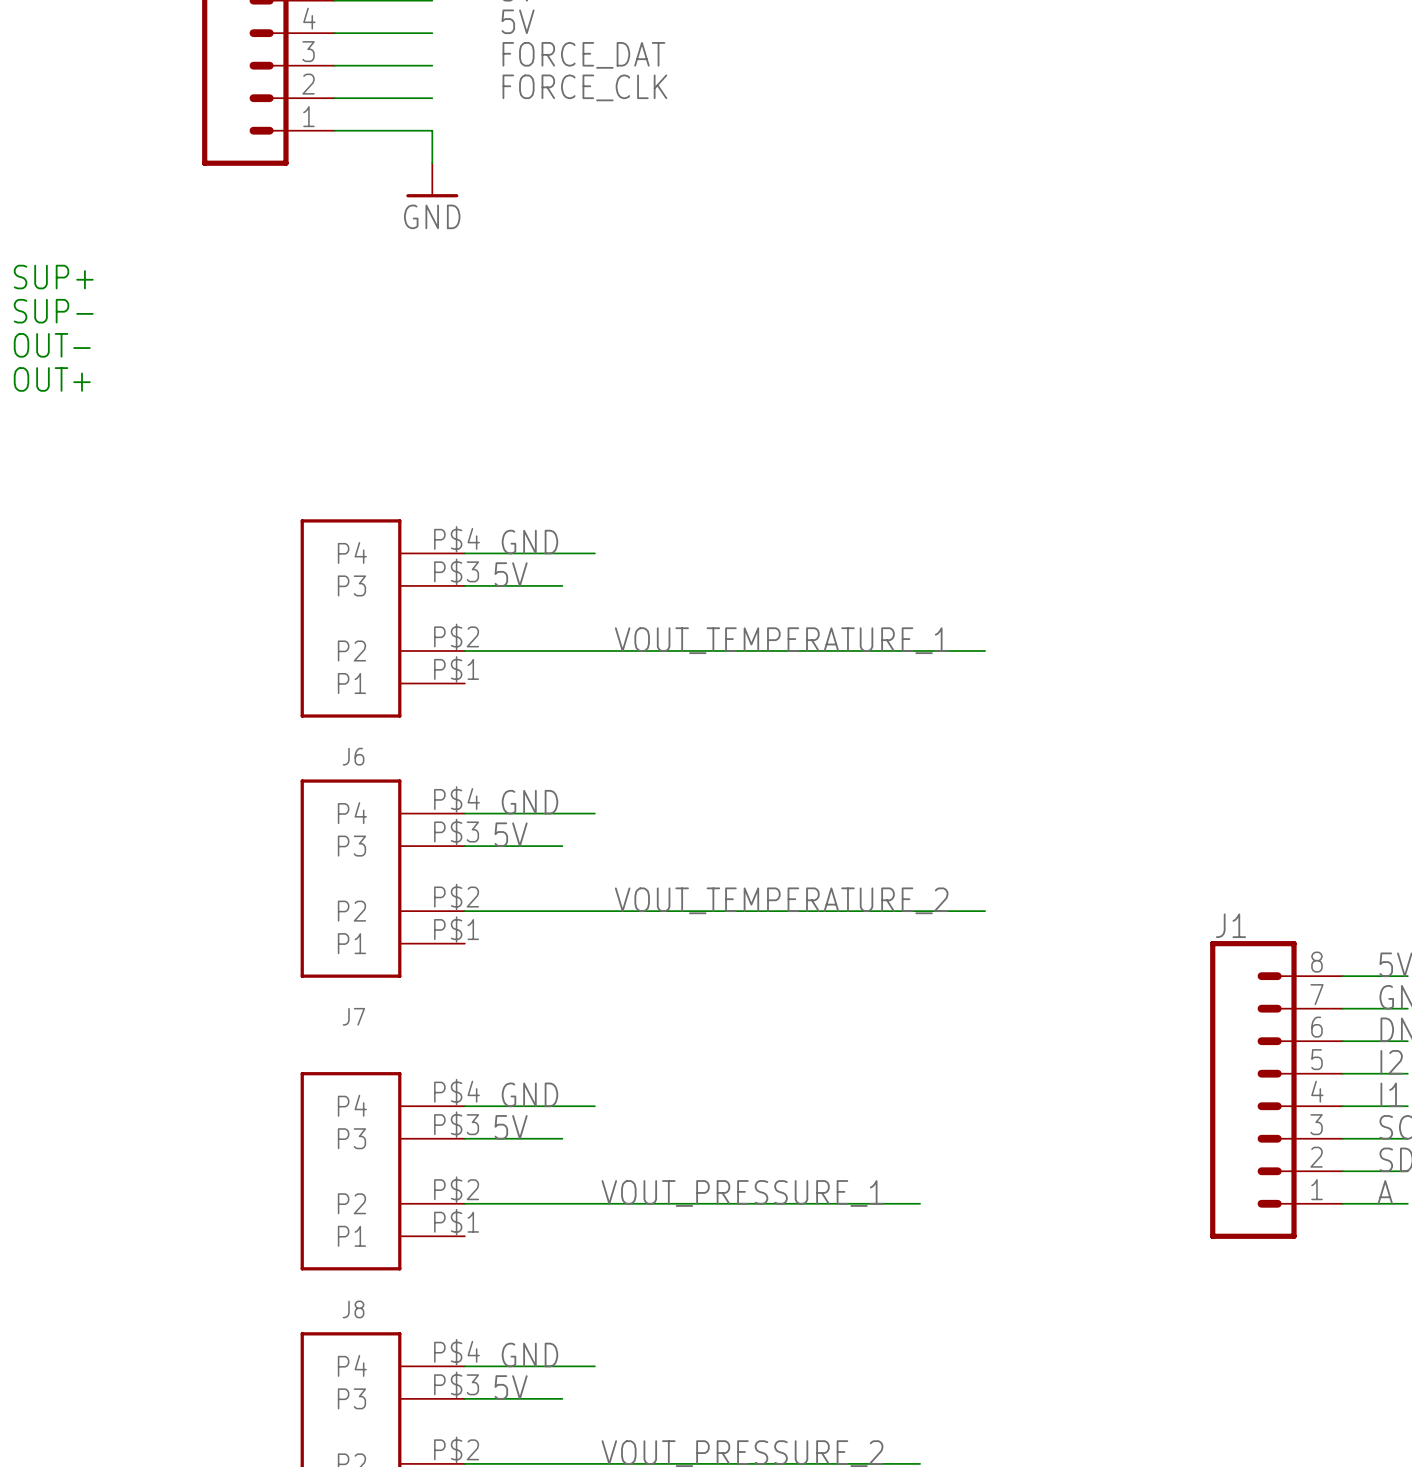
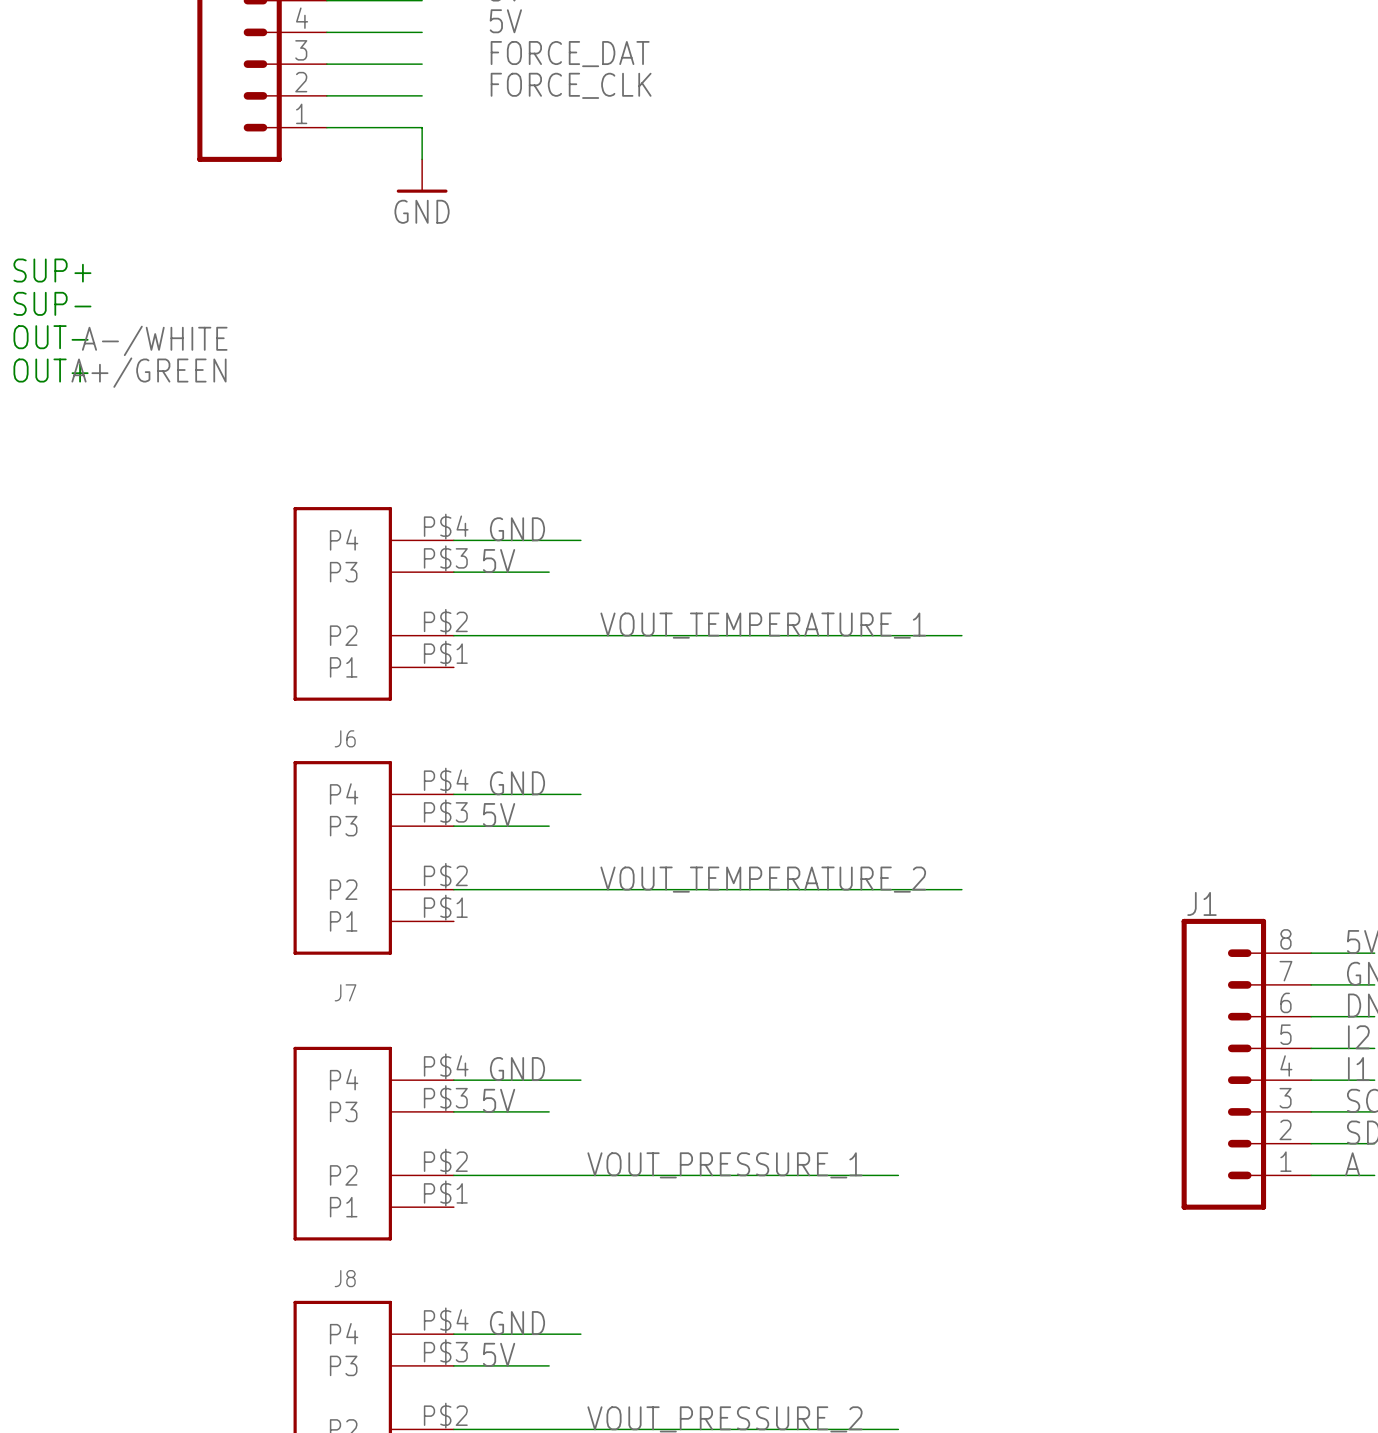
label: none -> A-/WHITE (154, 340)
label: none -> A+/GREEN (149, 372)

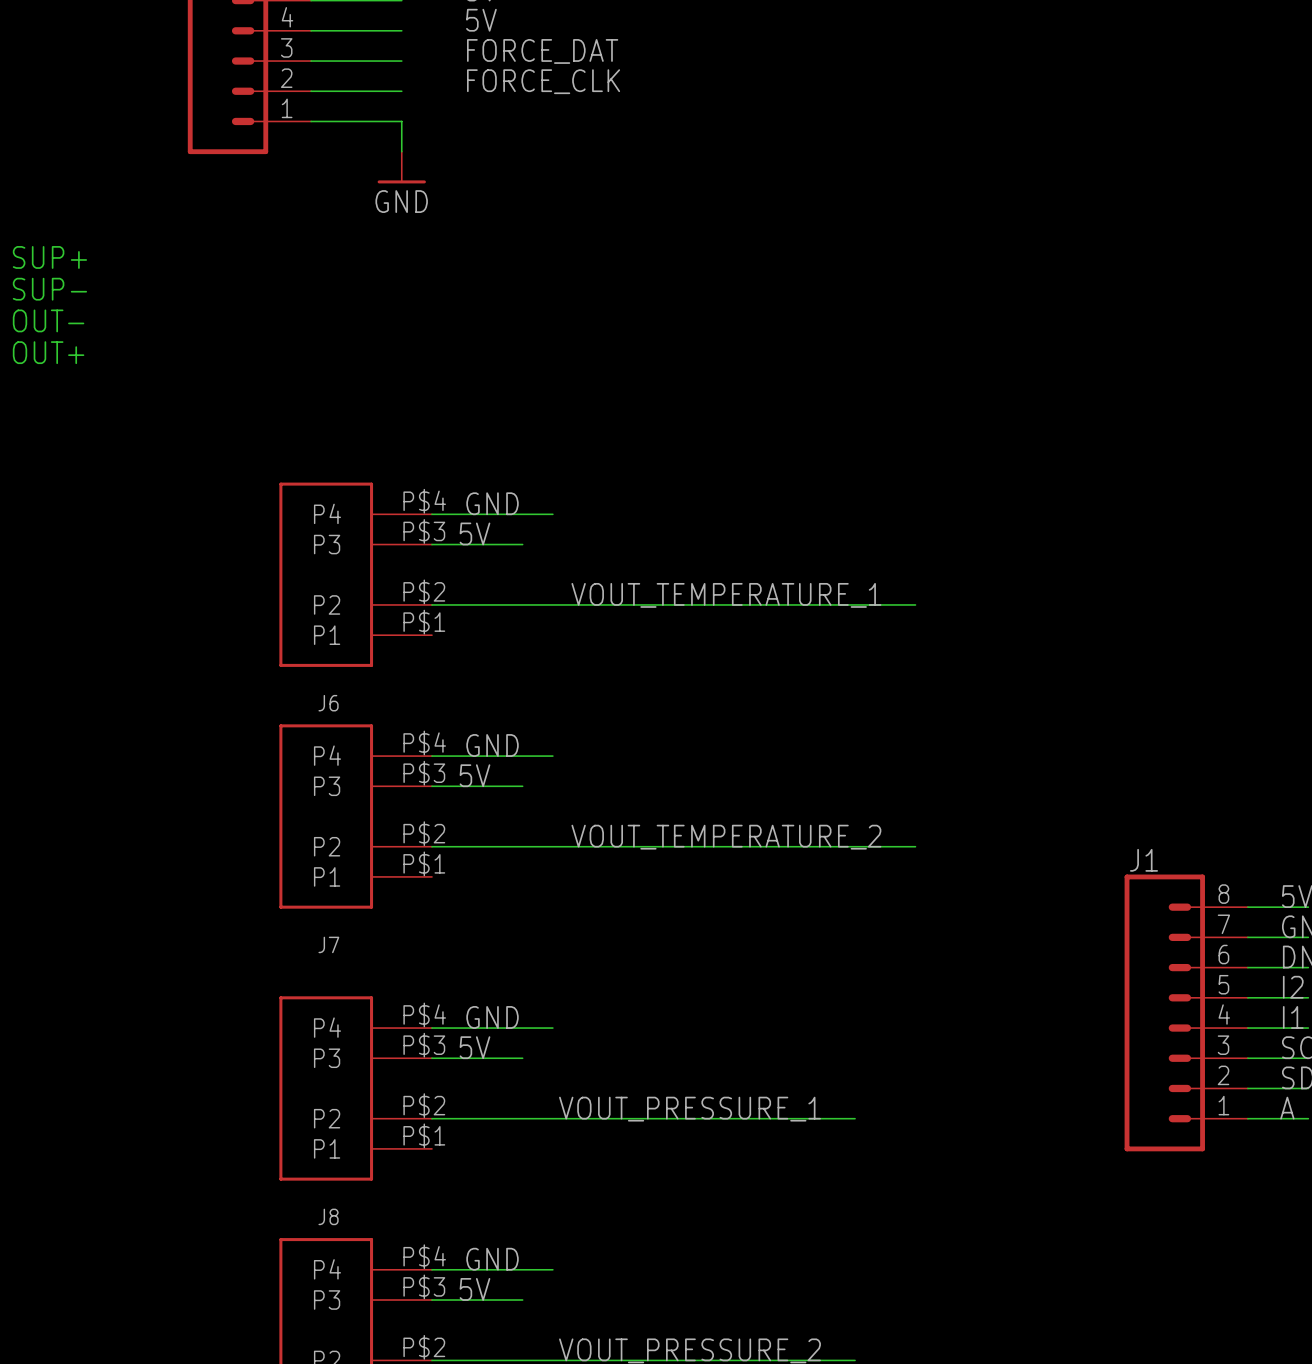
label: A-/WHITE (154, 340) -> none
label: A+/GREEN (149, 372) -> none

